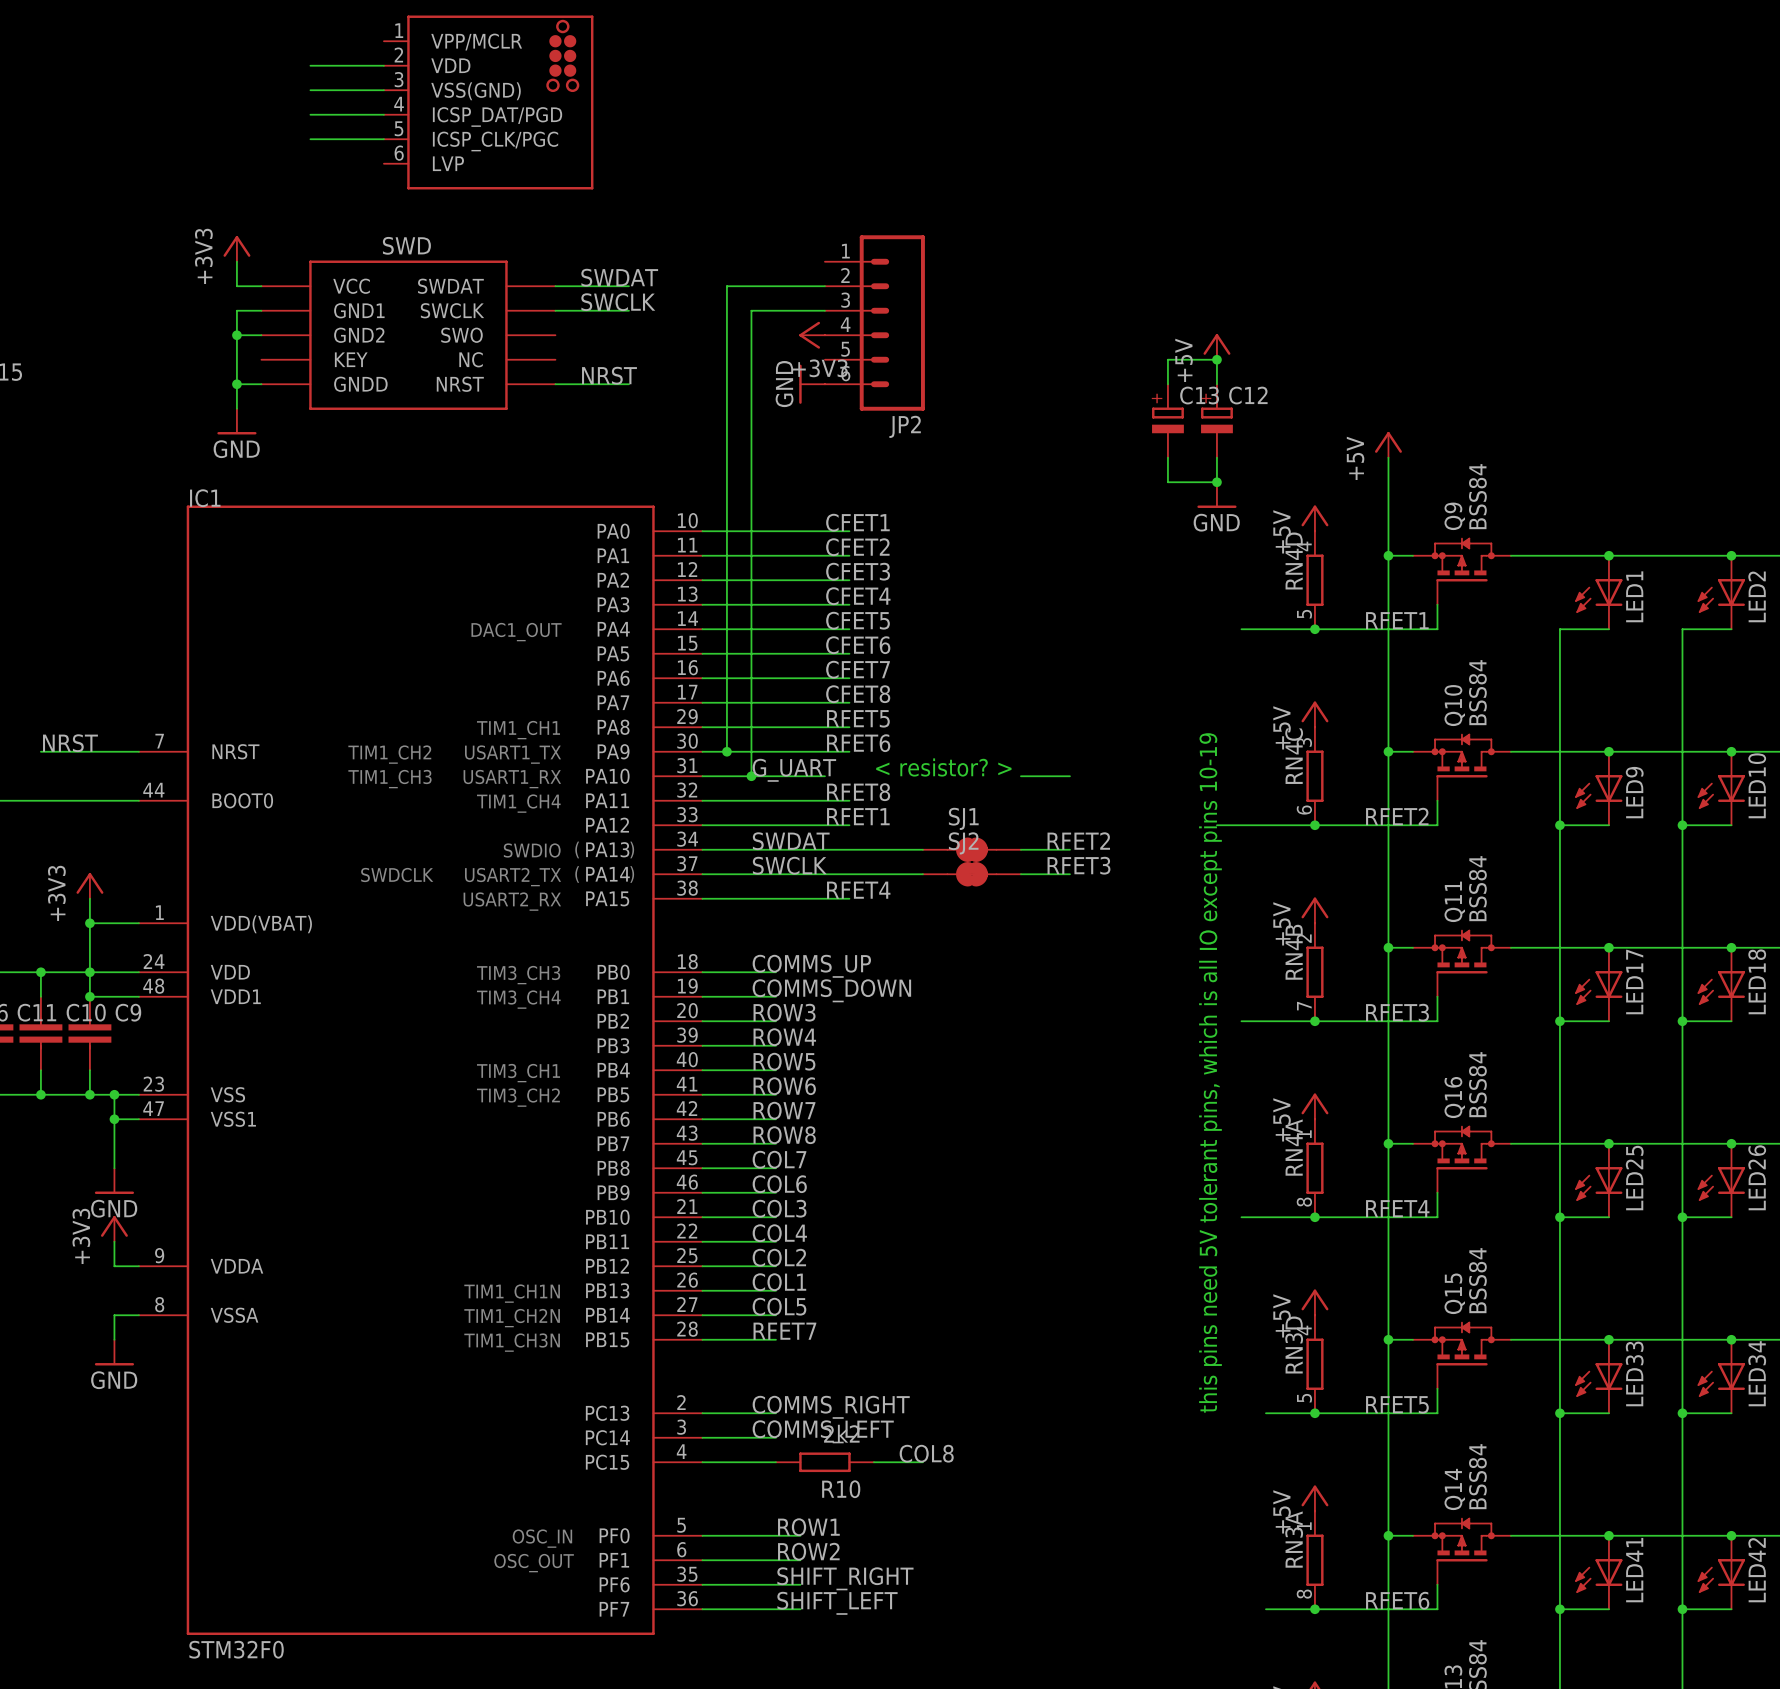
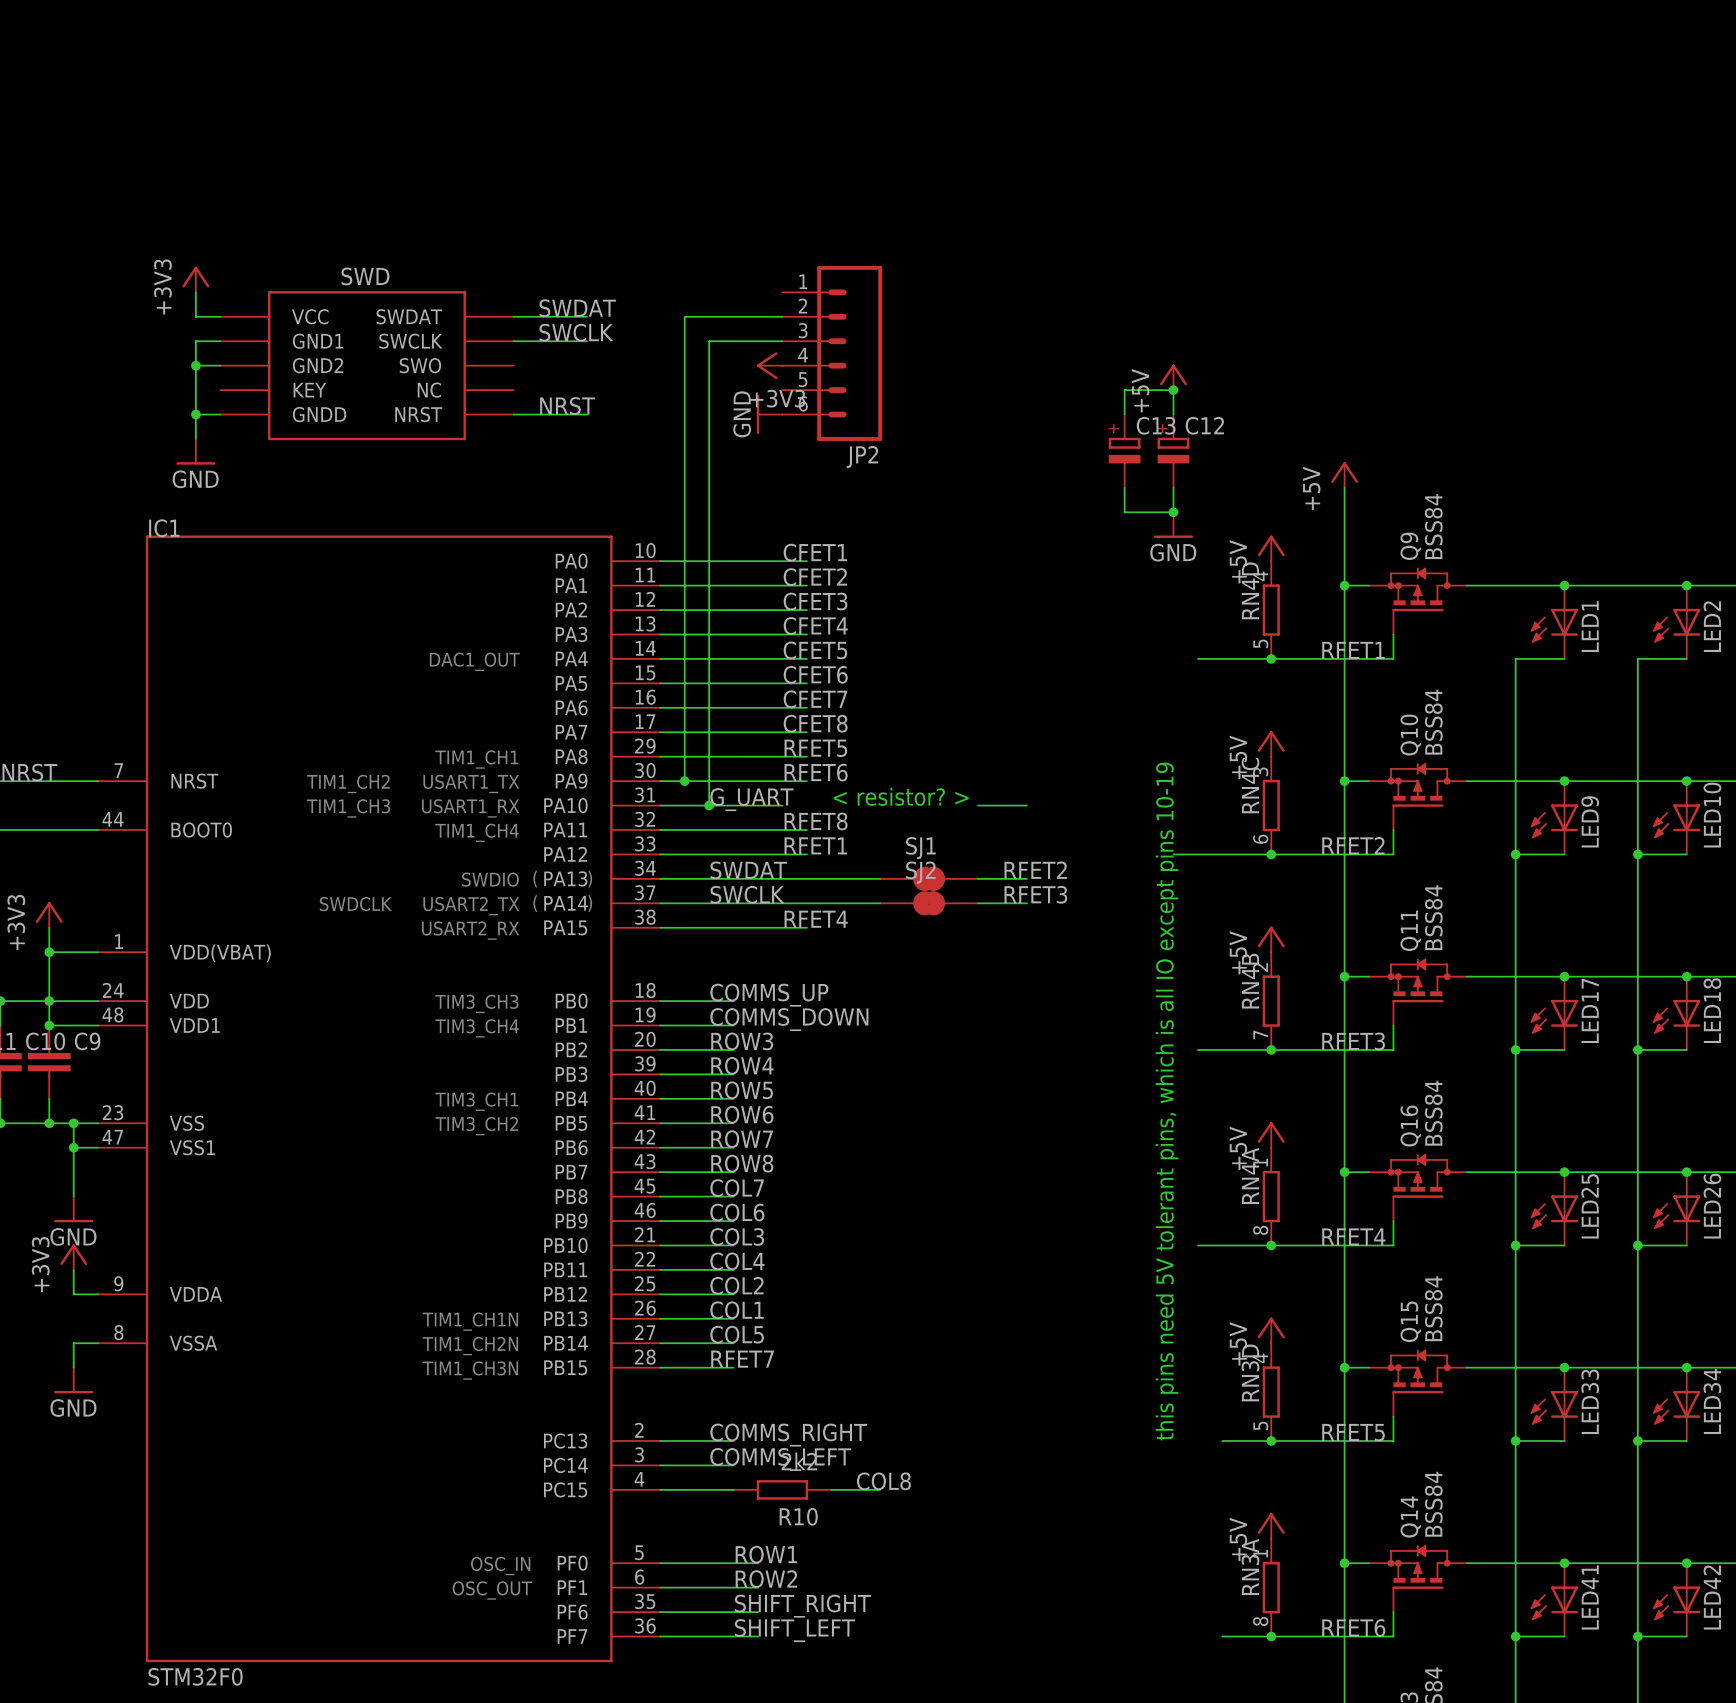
wire: (310, 65) (383, 65) -> none
wire: (310, 90) (383, 90) -> none
part: (488, 102) -> none
wire: (310, 114) (383, 114) -> none
wire: (310, 139) (383, 139) -> none

